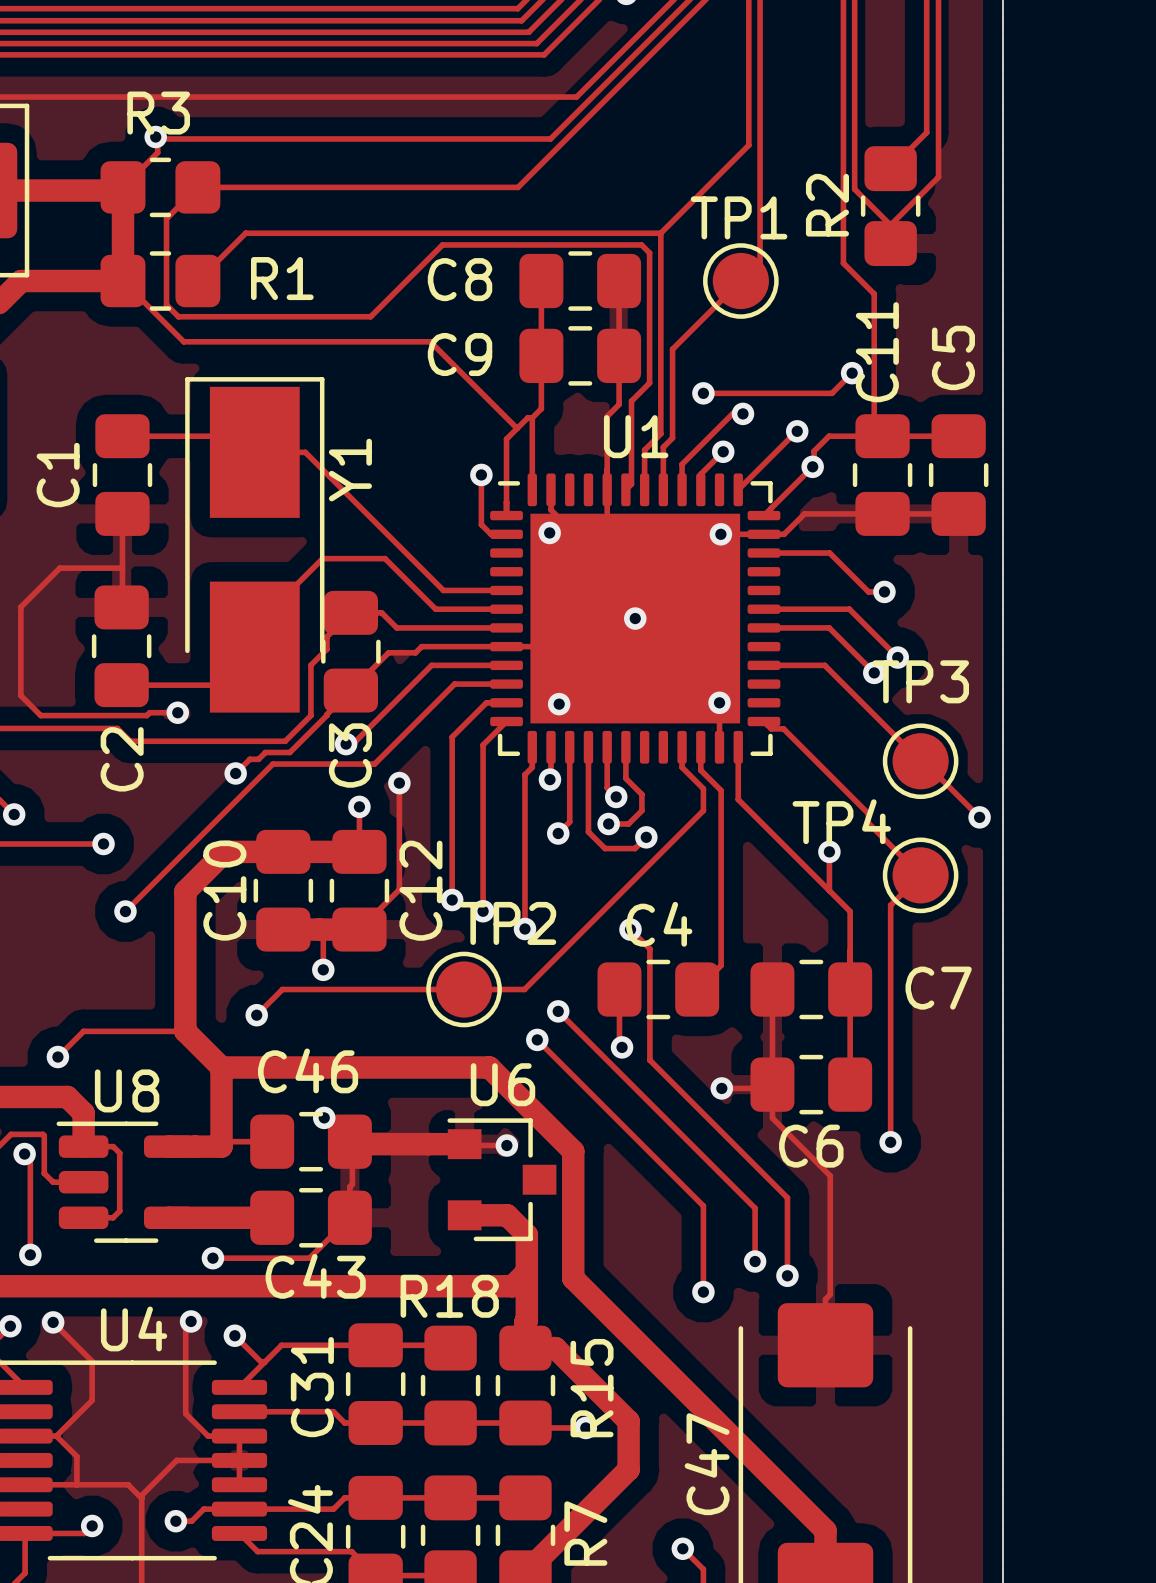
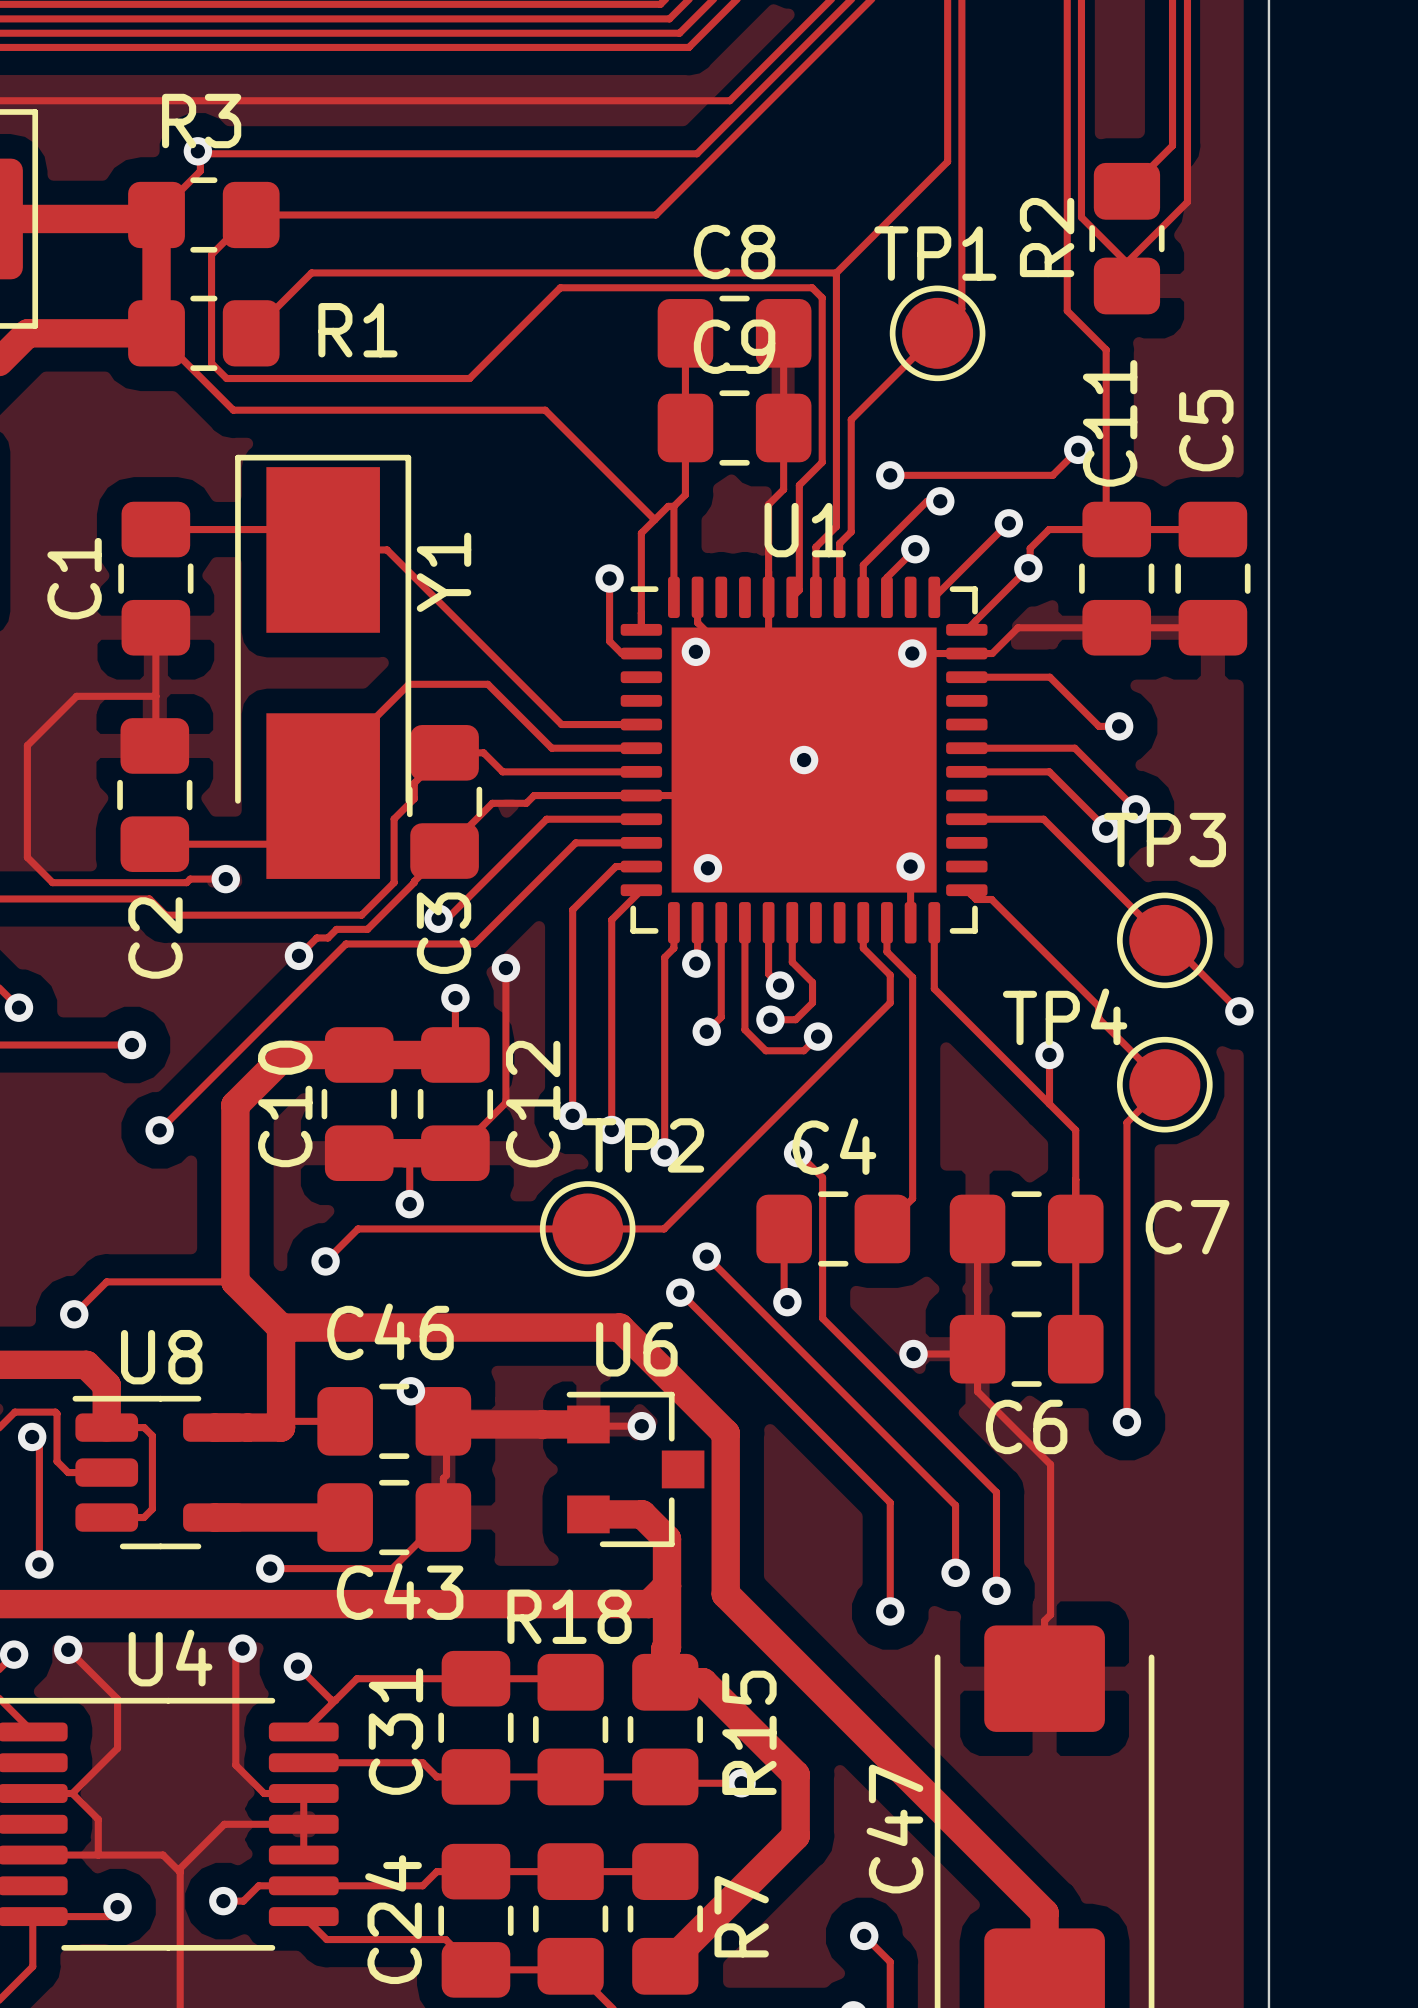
C8 name position: C8 (460, 279) -> C8 (734, 252)
C9 name position: C9 (460, 354) -> C9 (734, 346)

